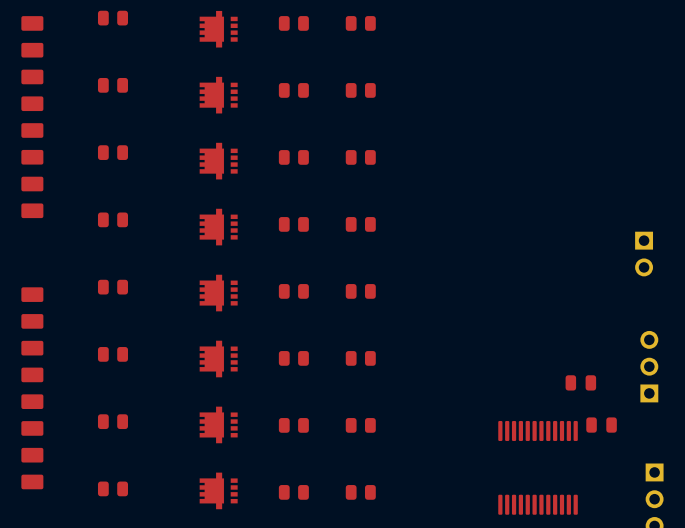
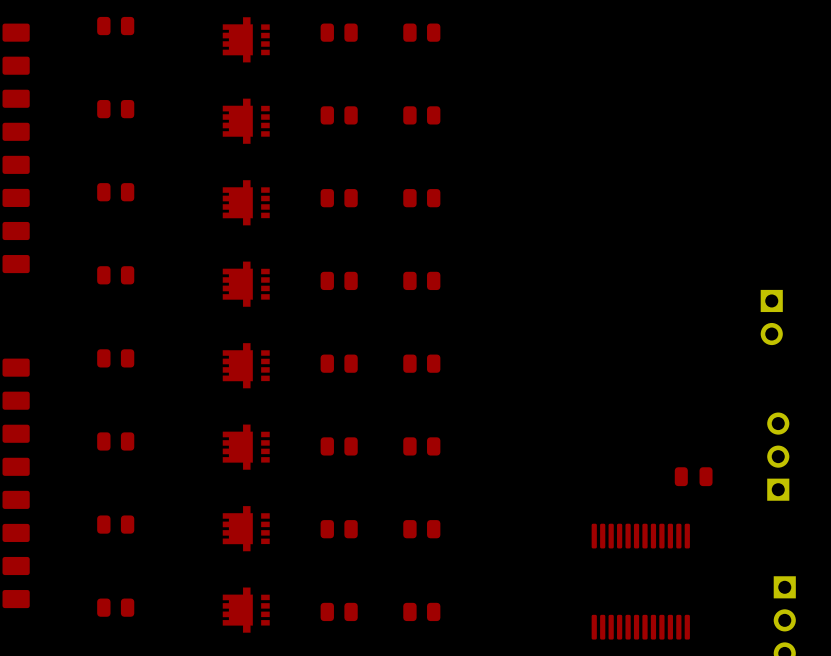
part: (601, 425) -> none

